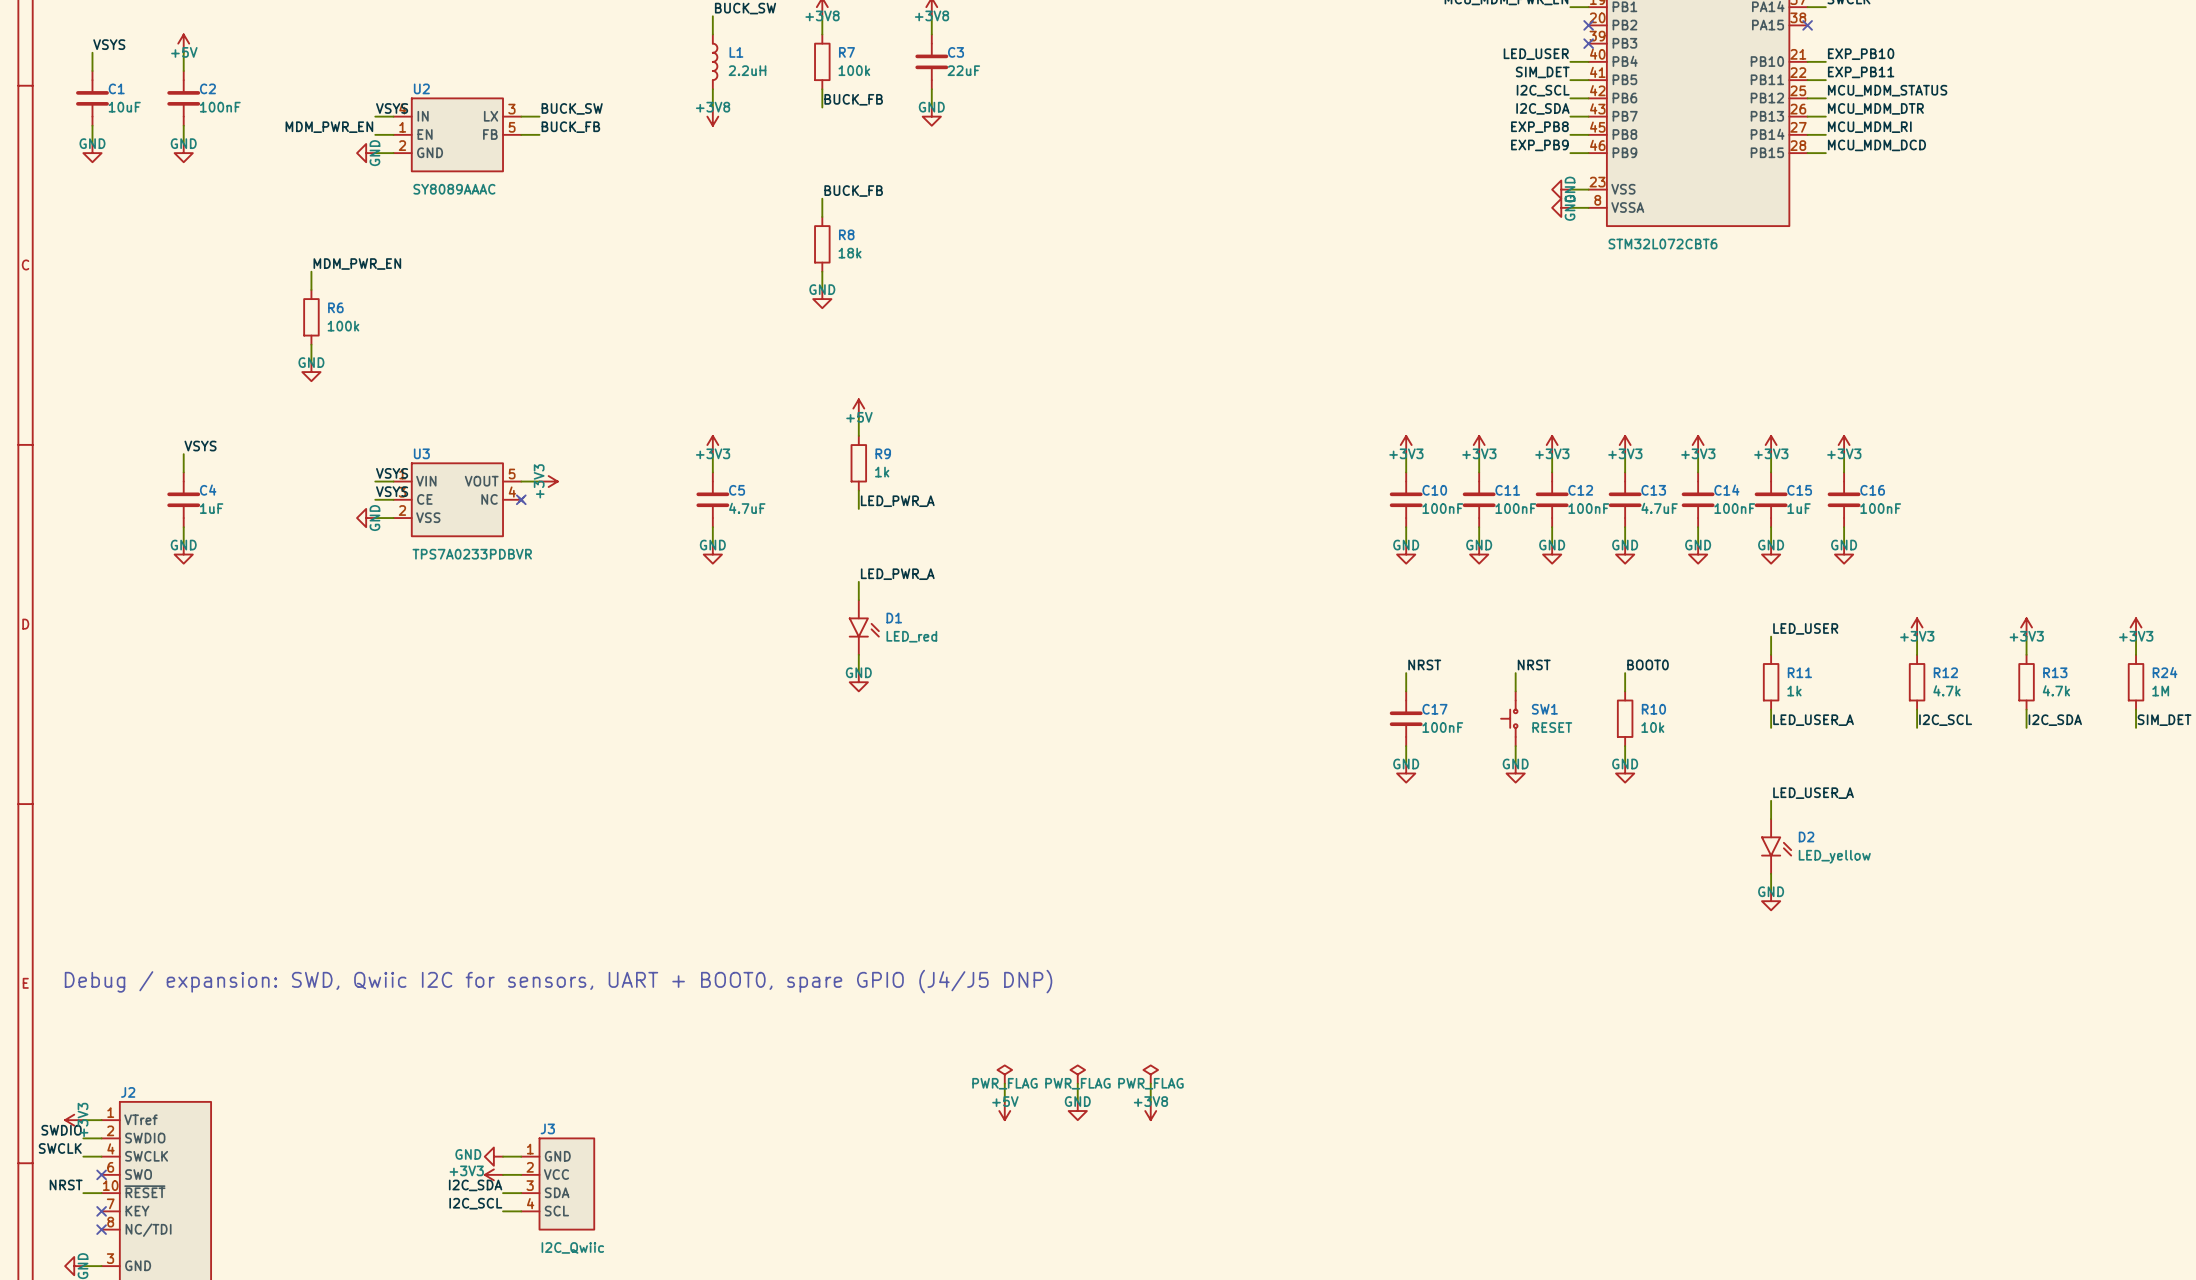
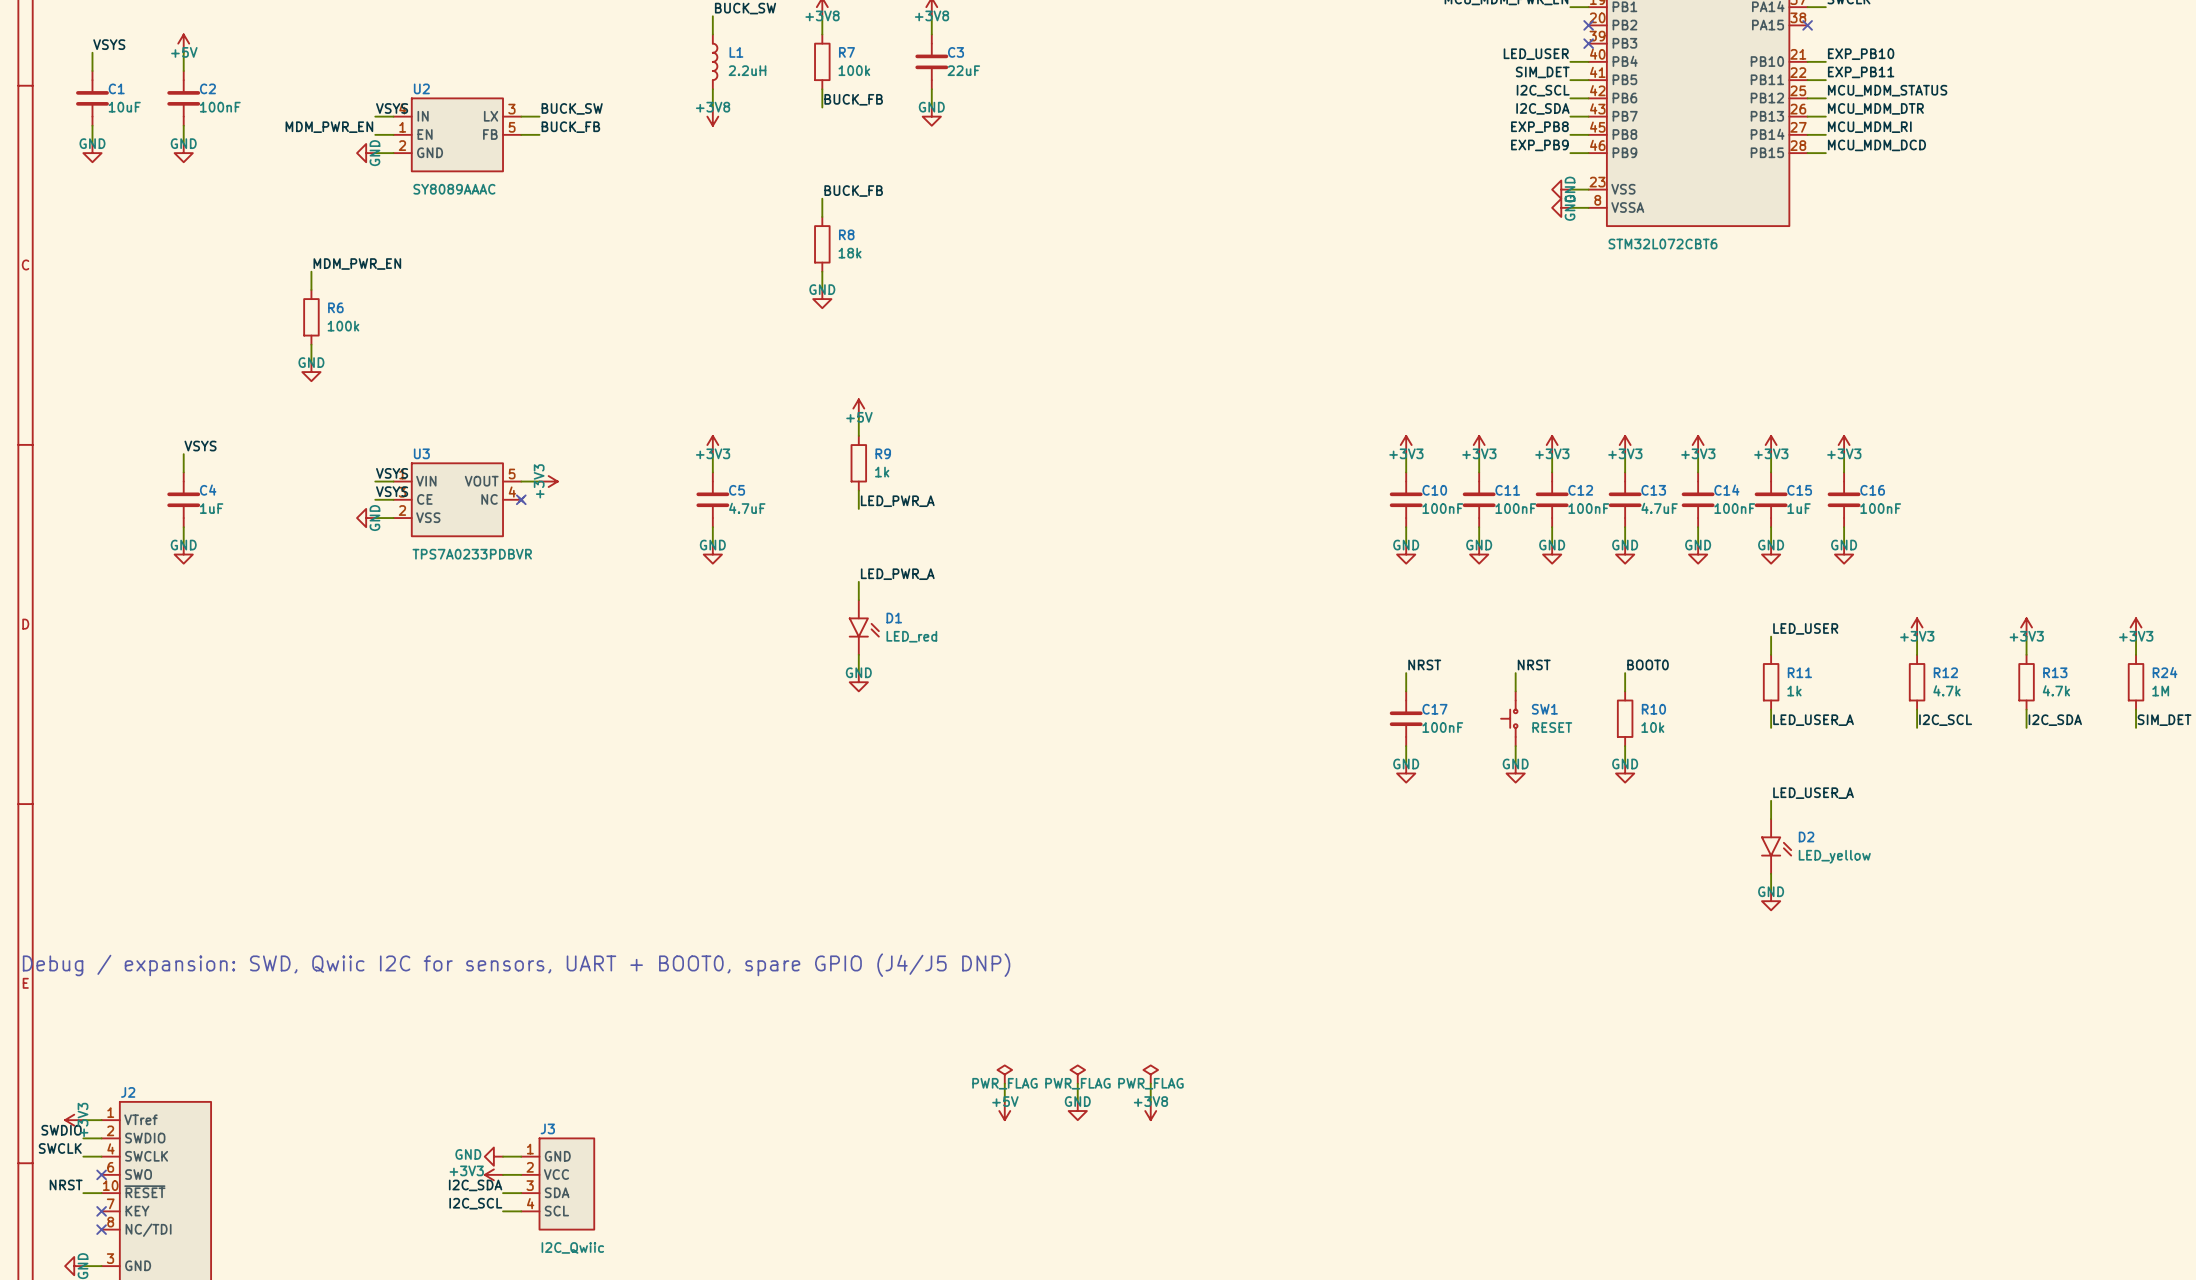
text position: Debug / expansion: SWD, Qwiic I2C for sensors, UART + BOOT0, spare GPIO (J4/J5 DNP) (558, 981) -> Debug / expansion: SWD, Qwiic I2C for sensors, UART + BOOT0, spare GPIO (J4/J5 DNP) (516, 965)

